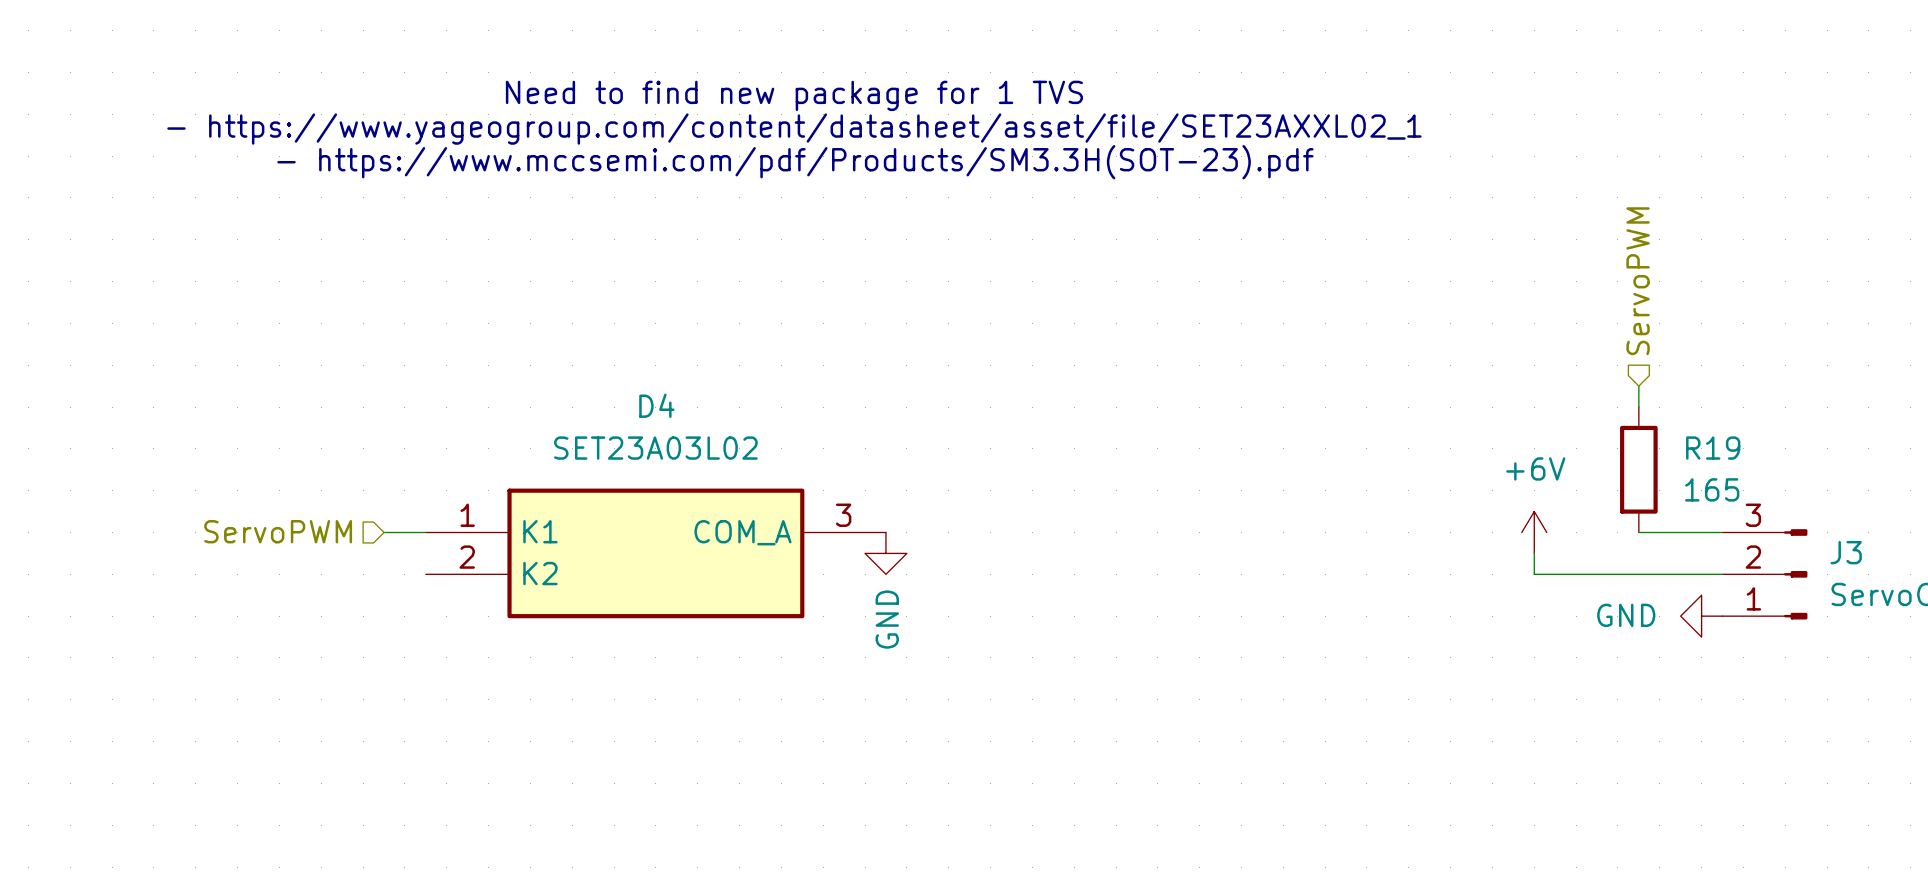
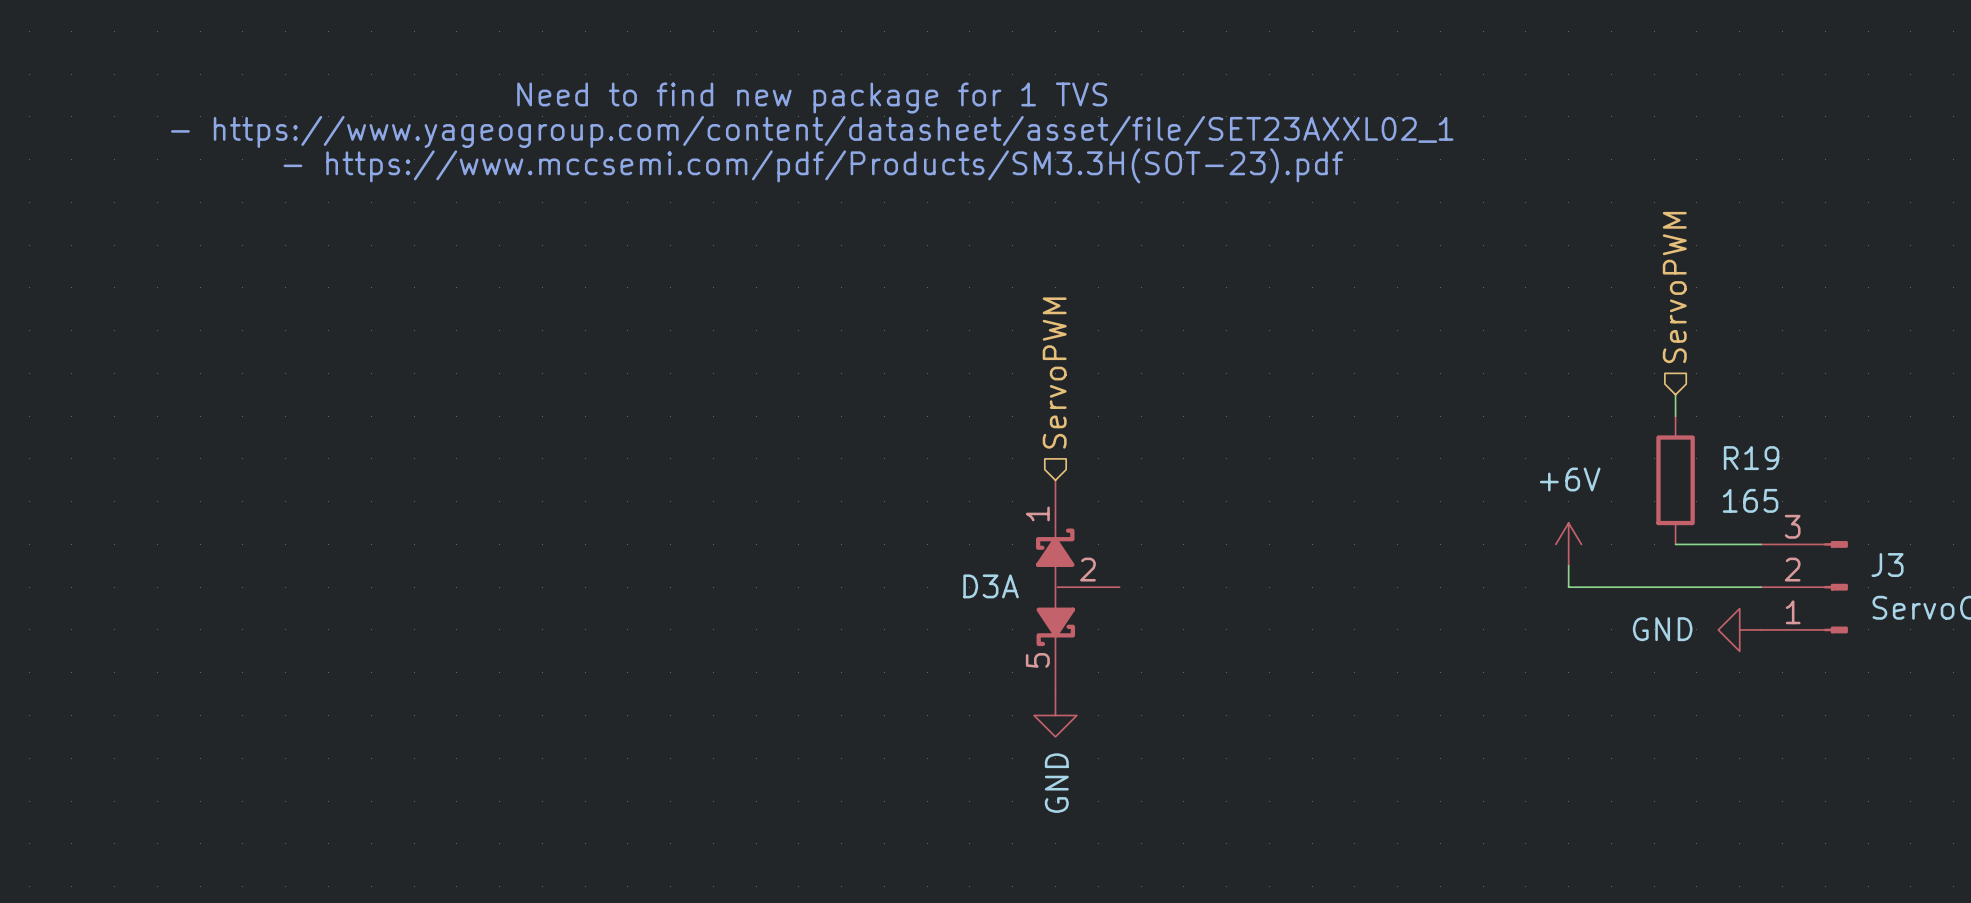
hierarchical label: none -> ServoPWM (1054, 373)
hierarchical label: ServoPWM (278, 531) -> none
wire: (384, 532) (425, 532) -> none
D4: SET23A03L02 (655, 553) -> none
power symbol position: GND (885, 553) -> GND (1055, 715)
D3A: none -> (1077, 587)

